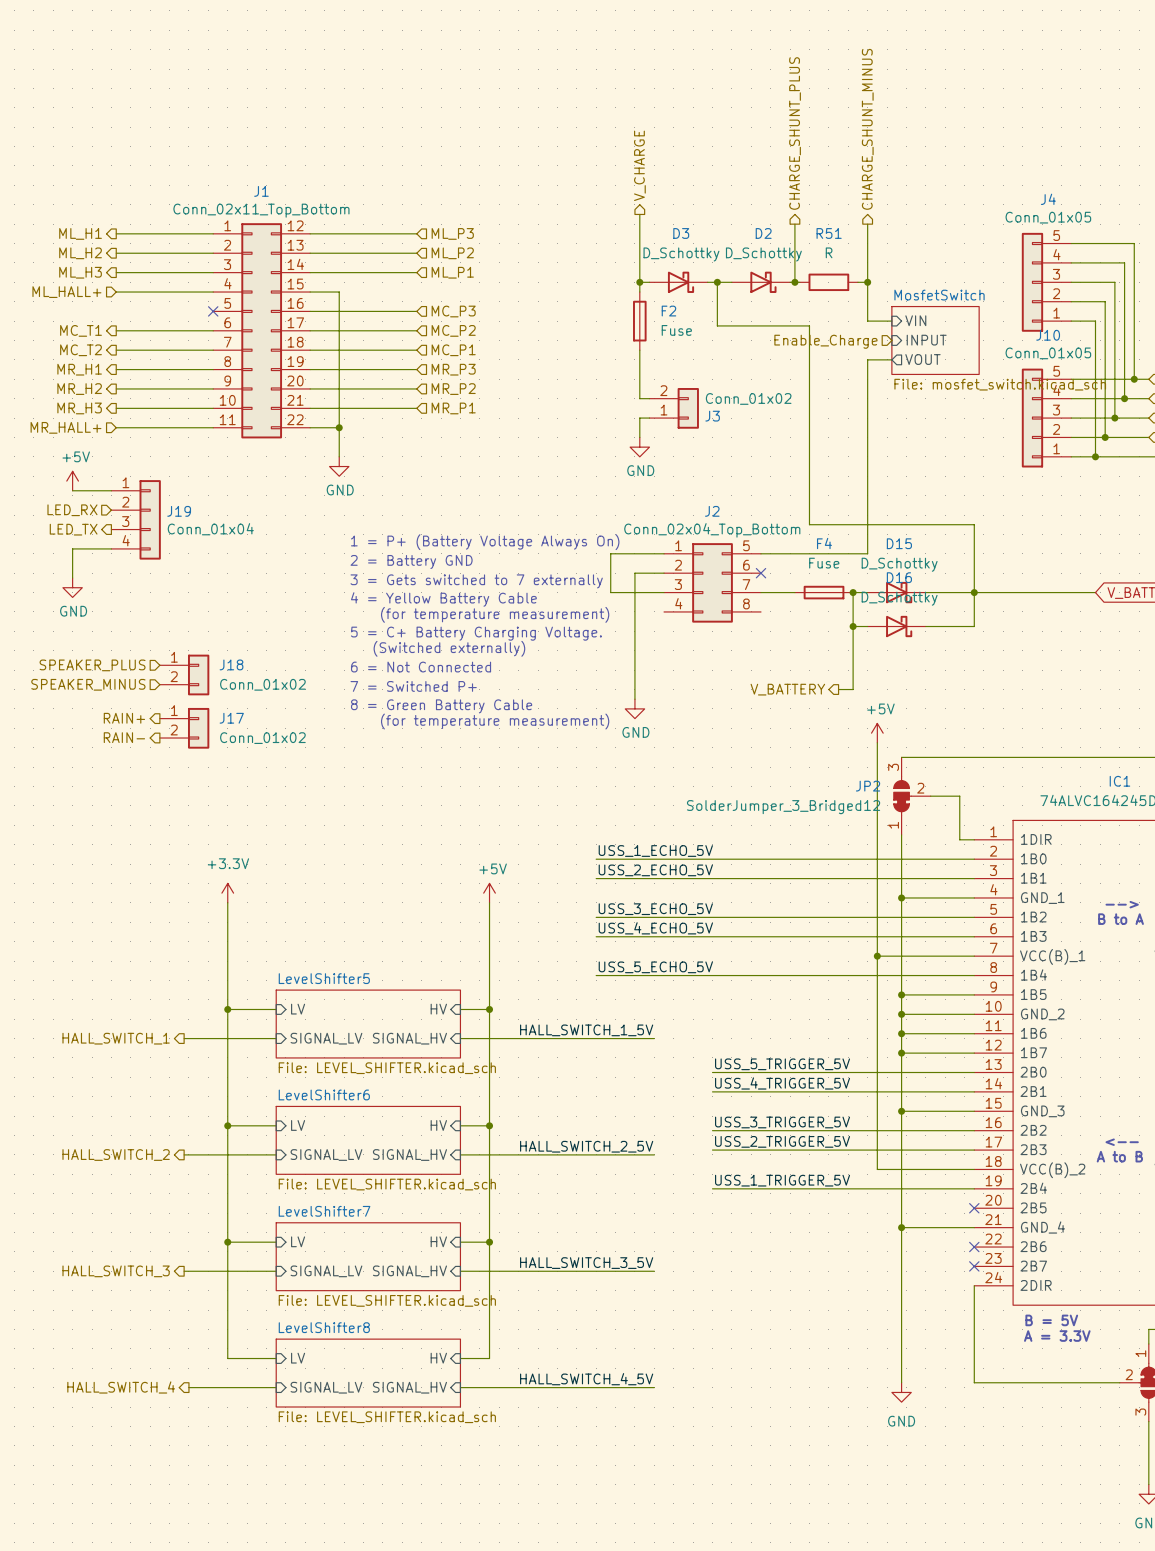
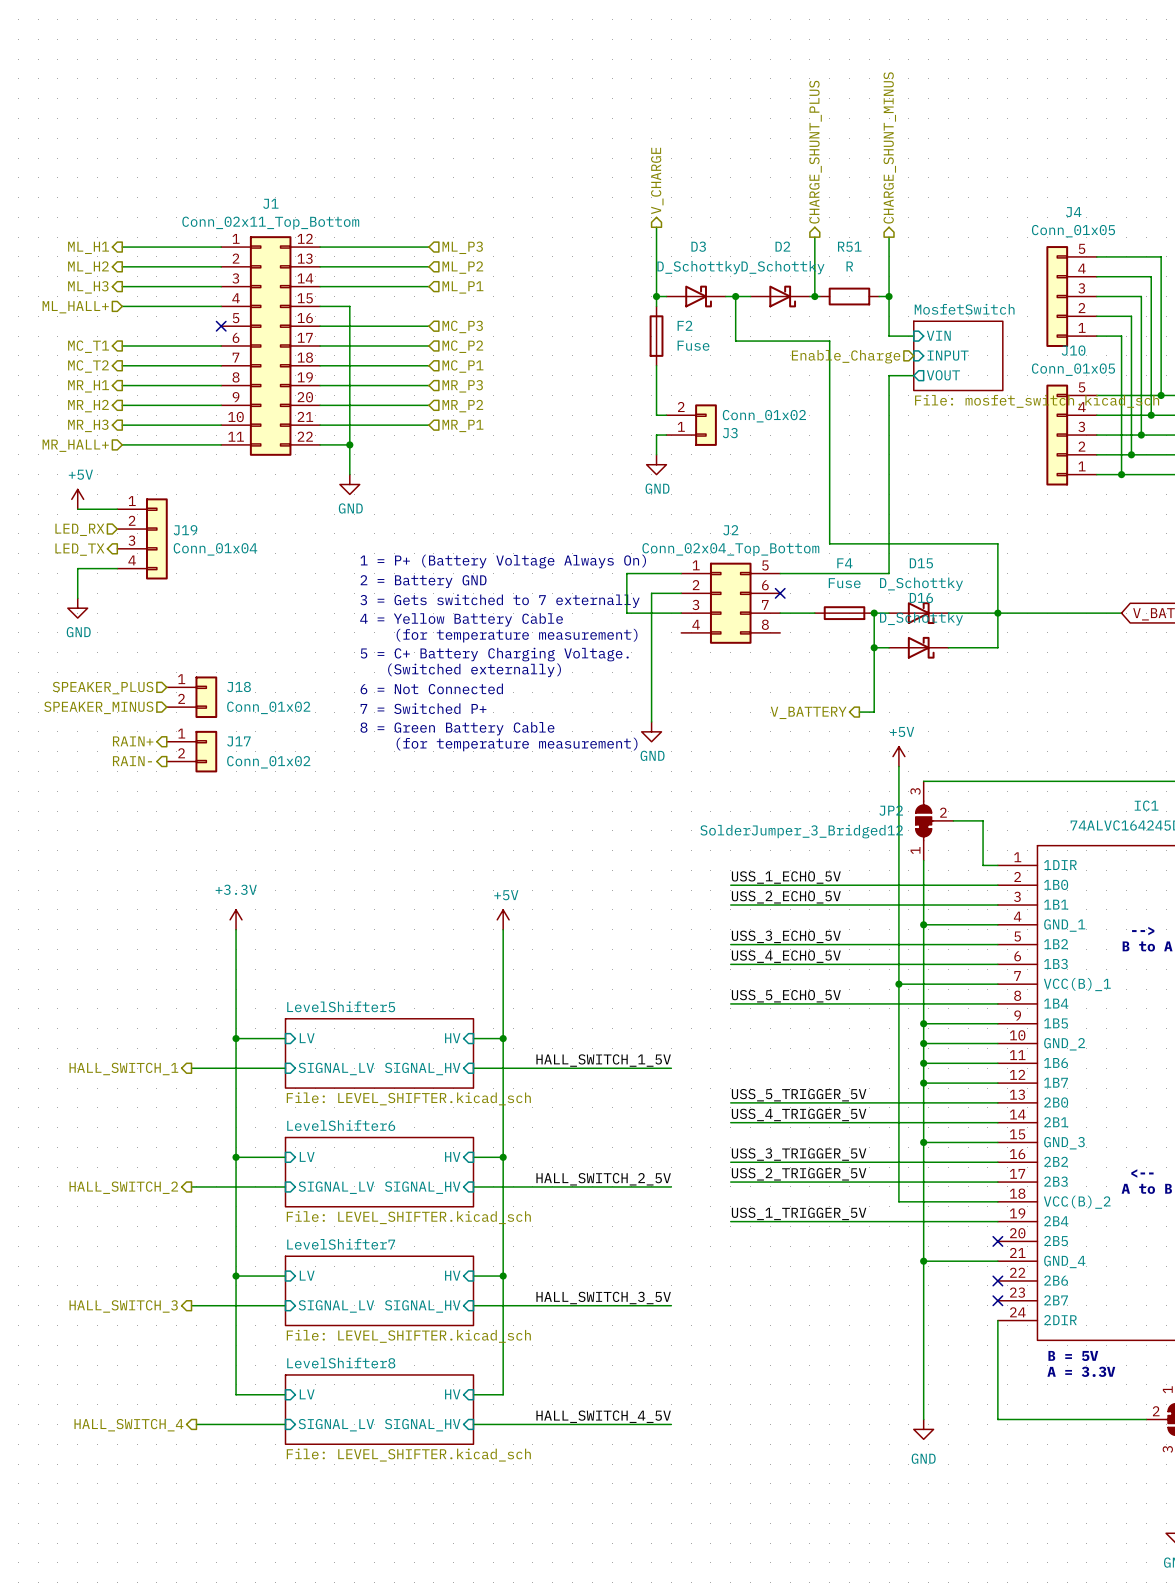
label position: USS_1_ECHO_5V (655, 851) -> USS_1_ECHO_5V (786, 877)
wire: (596, 859) (712, 859) -> none
label position: USS_2_ECHO_5V (655, 870) -> USS_2_ECHO_5V (786, 897)
wire: (596, 878) (712, 878) -> none
label position: USS_3_ECHO_5V (655, 909) -> USS_3_ECHO_5V (786, 936)
wire: (596, 917) (712, 917) -> none
label position: USS_4_ECHO_5V (655, 928) -> USS_4_ECHO_5V (786, 956)
wire: (596, 936) (712, 936) -> none
label position: USS_5_ECHO_5V (655, 967) -> USS_5_ECHO_5V (786, 996)
wire: (596, 975) (712, 975) -> none

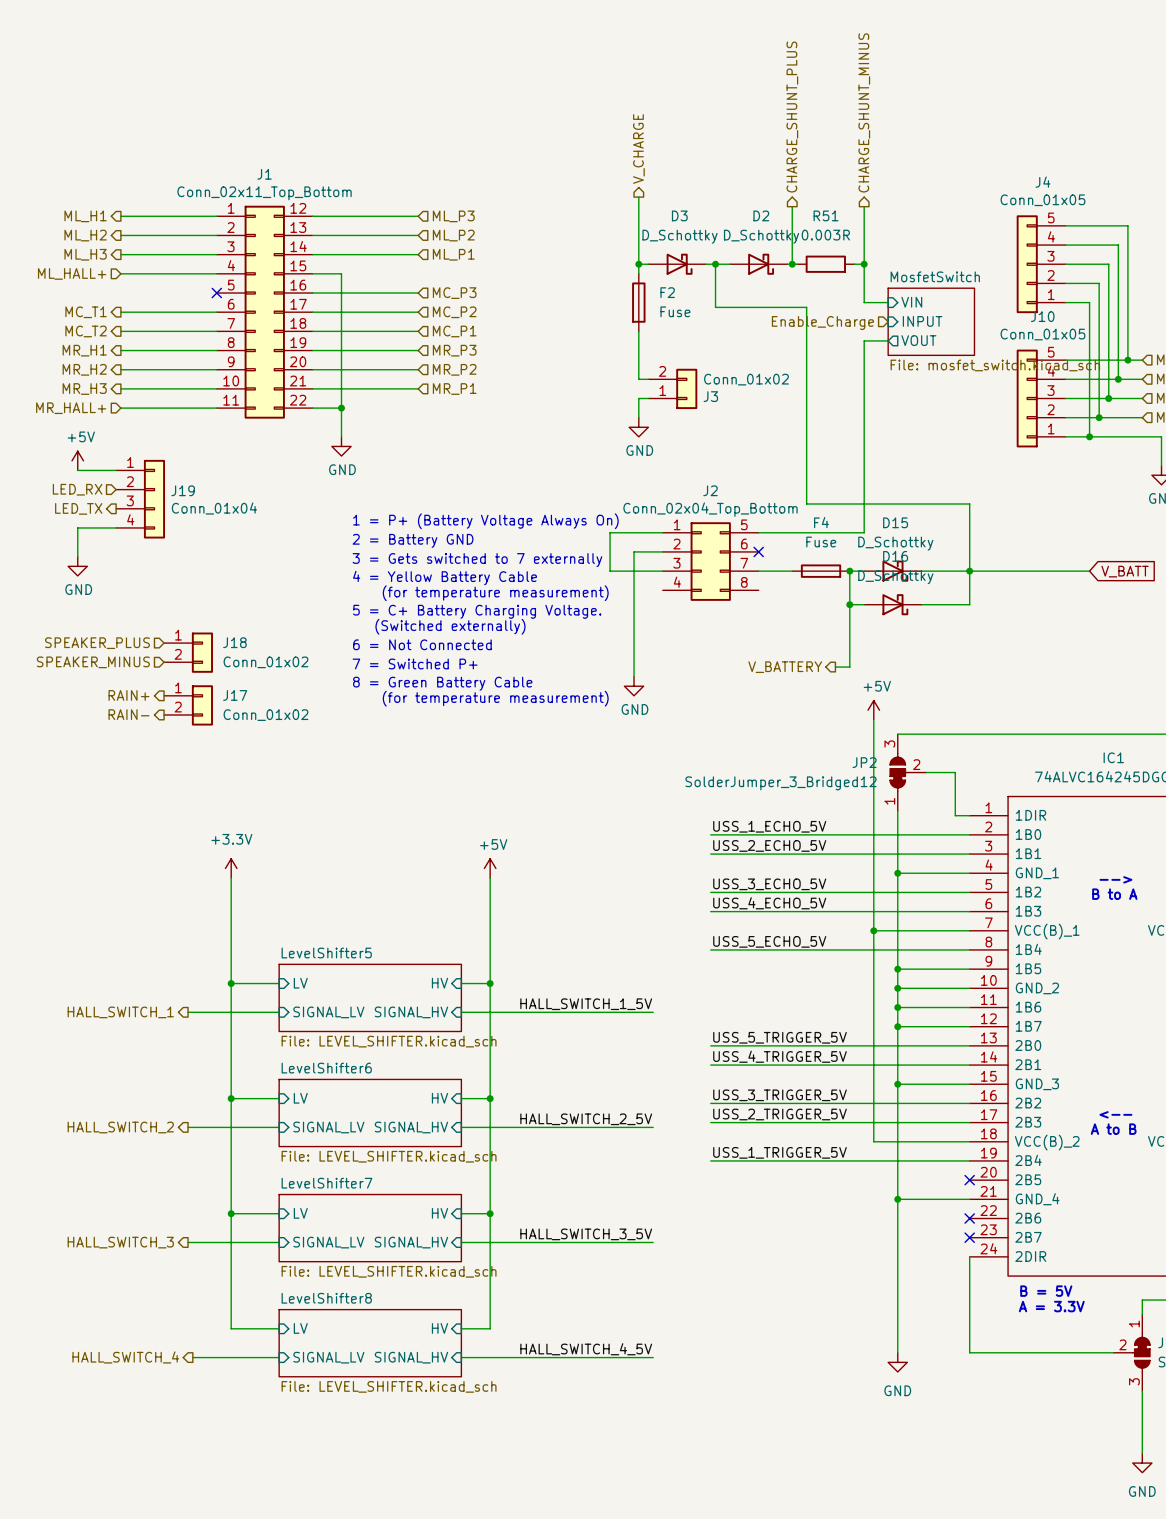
R51 value: R (849, 266) -> 0.003R (825, 235)

